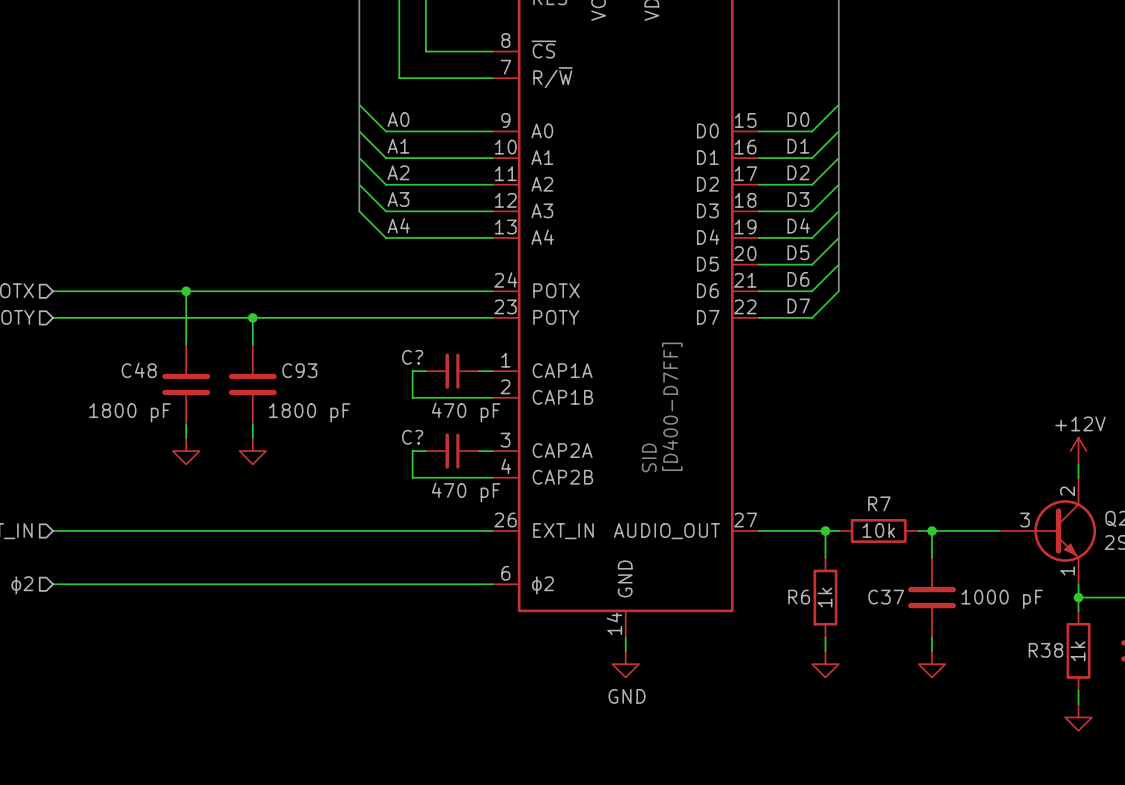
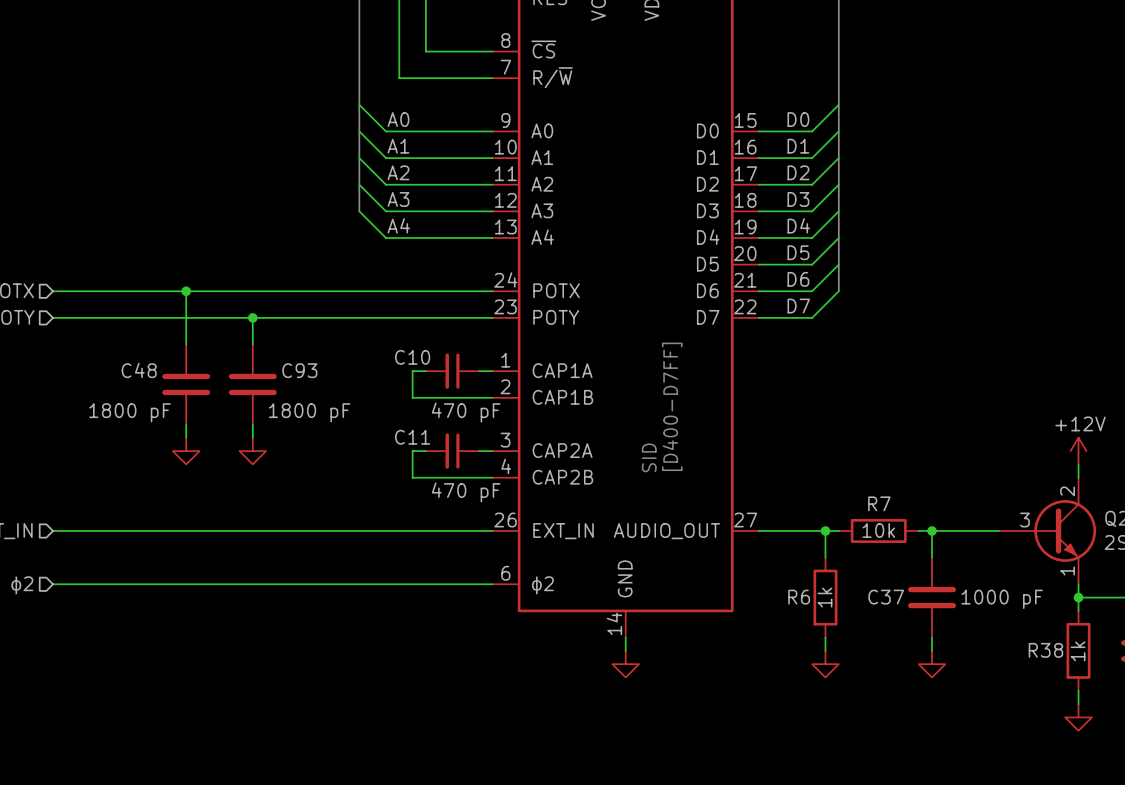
C? name: C? (412, 357) -> C10 (412, 357)
C? name: C? (412, 437) -> C11 (412, 437)
power symbol text: GND (627, 696) -> none

